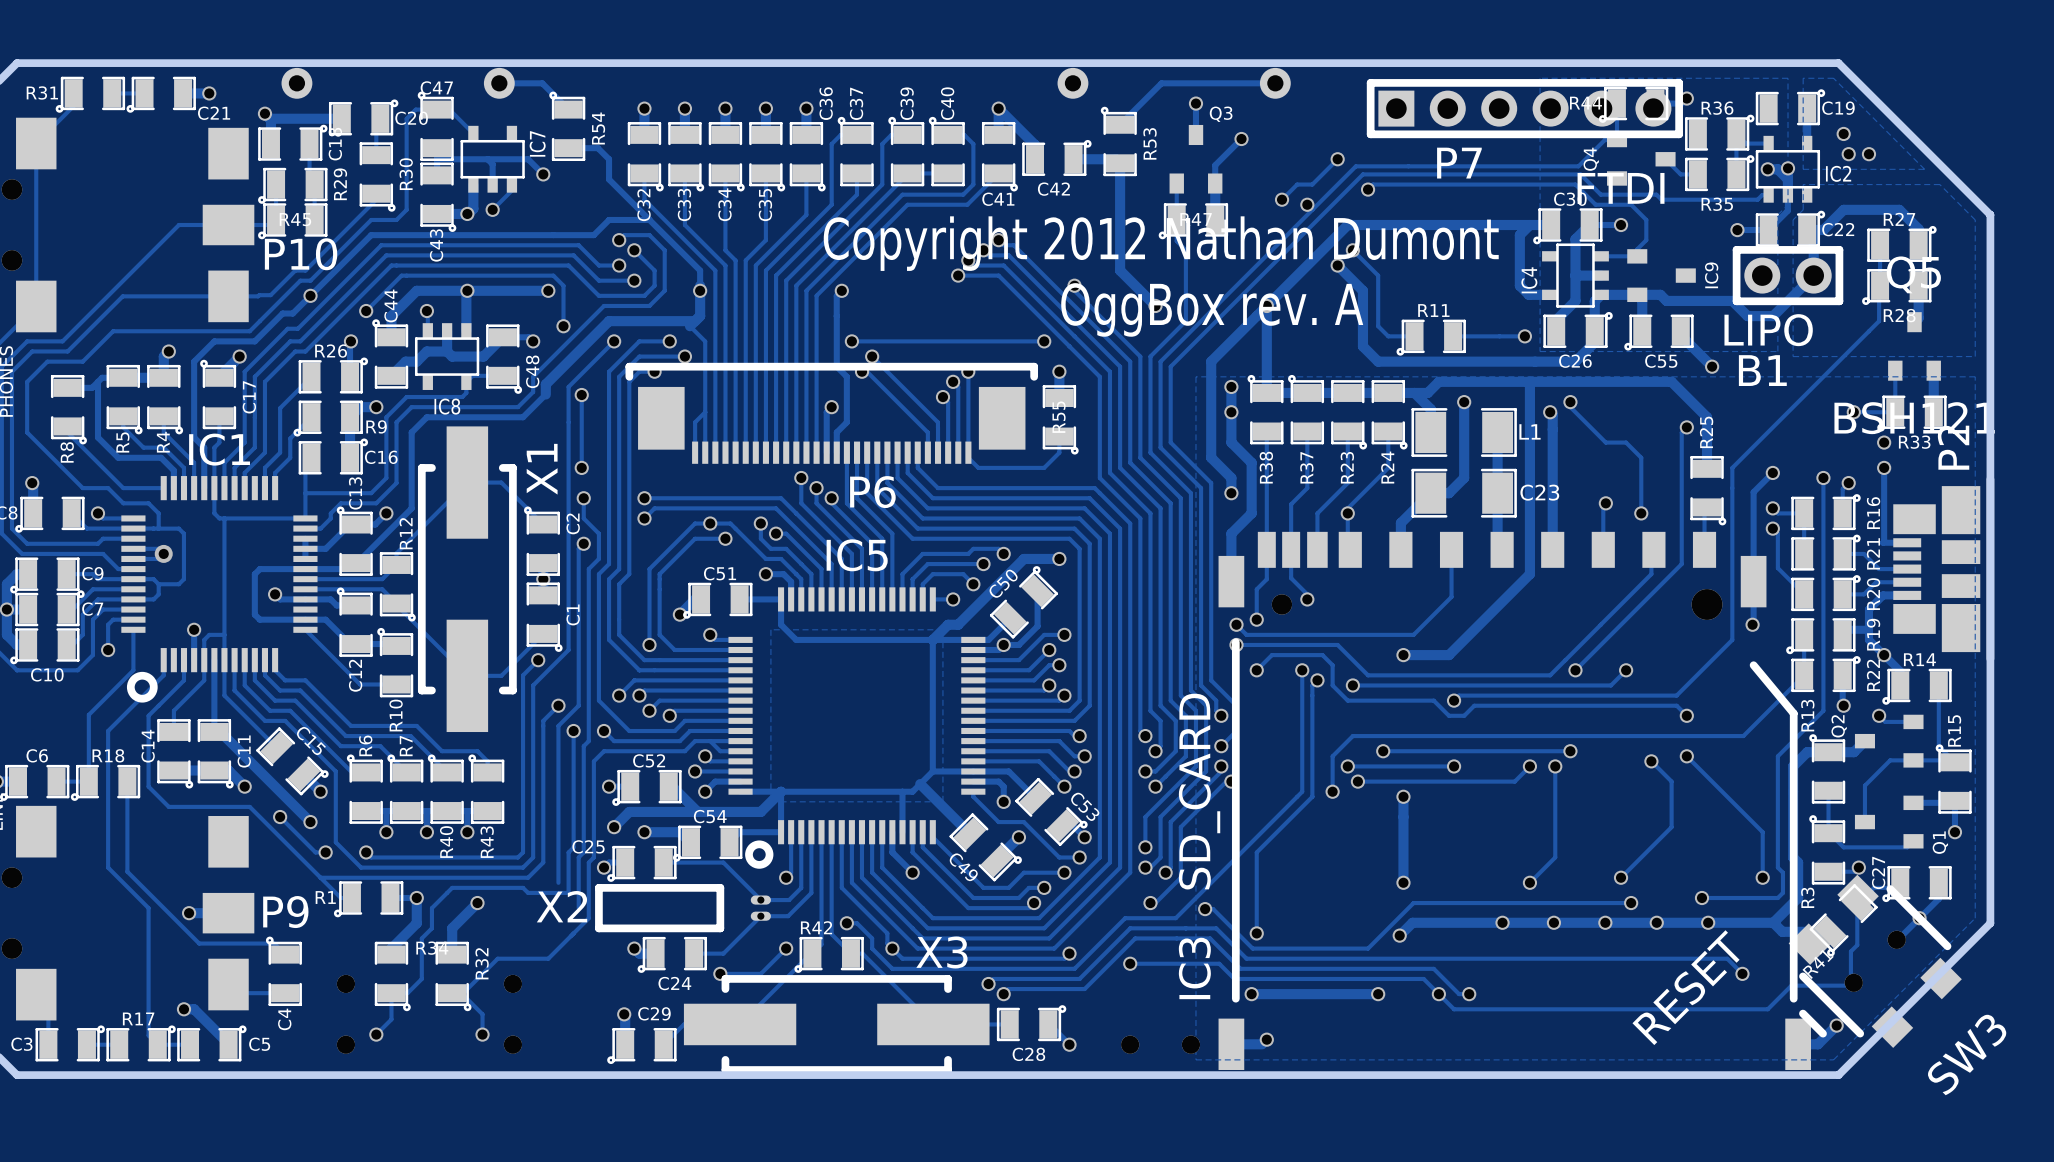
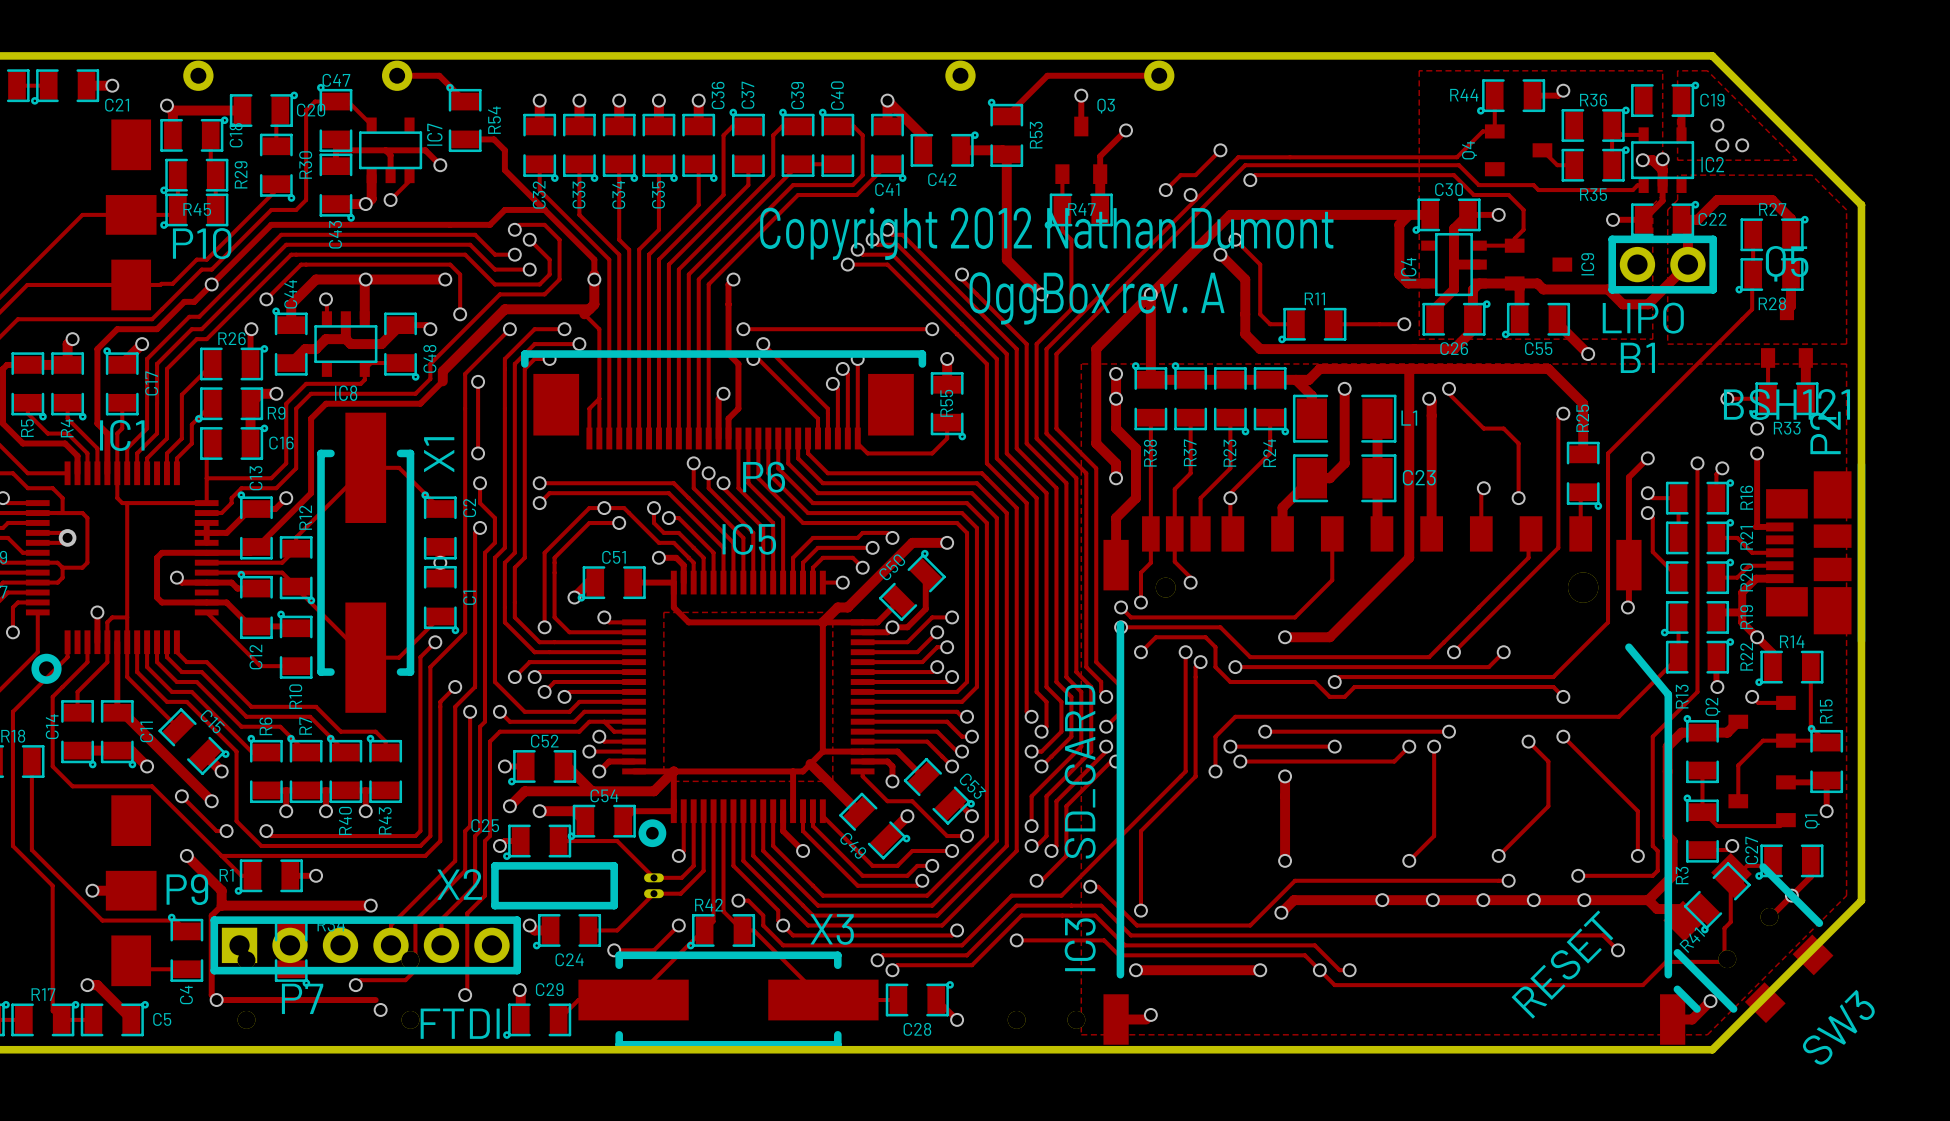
P7 position: (1524, 108) -> (365, 945)
track: none -> (186, 855) (221, 890) (221, 905)
via: none -> (186, 855)
track: none -> (455, 860) (390, 925) (390, 945)
track: (568, 892) (528, 892) (523, 887) (452, 887) (431, 908) (431, 928) (421, 938) (421, 978) (407, 993) (391, 993) (391, 1019) (376, 1034) -> (465, 870) (415, 920) (415, 970) (405, 980) (360, 980) (355, 985)
track: (416, 898) (416, 923) (391, 948) (391, 954) -> none
track: (477, 903) (452, 928) (452, 954) -> none
via position: (477, 903) -> (370, 905)
track: none -> (475, 885) (441, 919) (441, 945)
track: none -> (221, 905) (370, 905)
track: none -> (221, 905) (211, 915) (211, 995) (216, 1000) (375, 1000)
track: (570, 936) (548, 958) (497, 958) (463, 993) (452, 993) -> (467, 913) (467, 992) (465, 995)
R32: (453, 976) -> none
track: (461, 993) (482, 1014) (482, 1034) -> none
via: none -> (355, 985)
via: none -> (465, 995)
via: none -> (216, 1000)
via: (376, 1034) -> none

